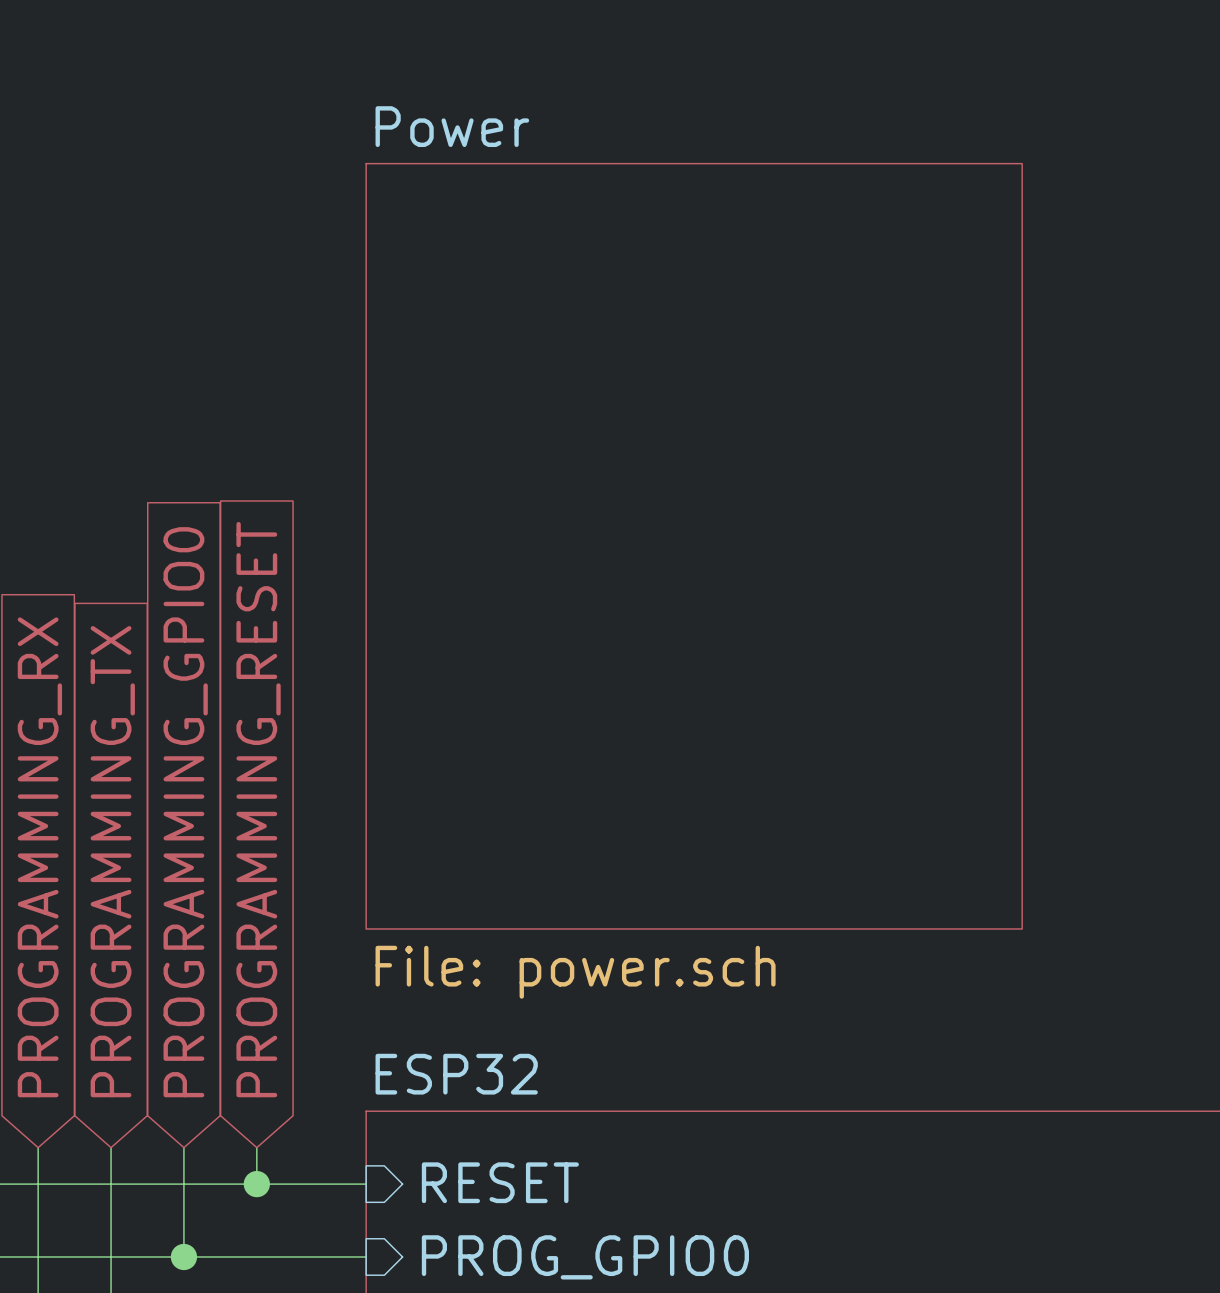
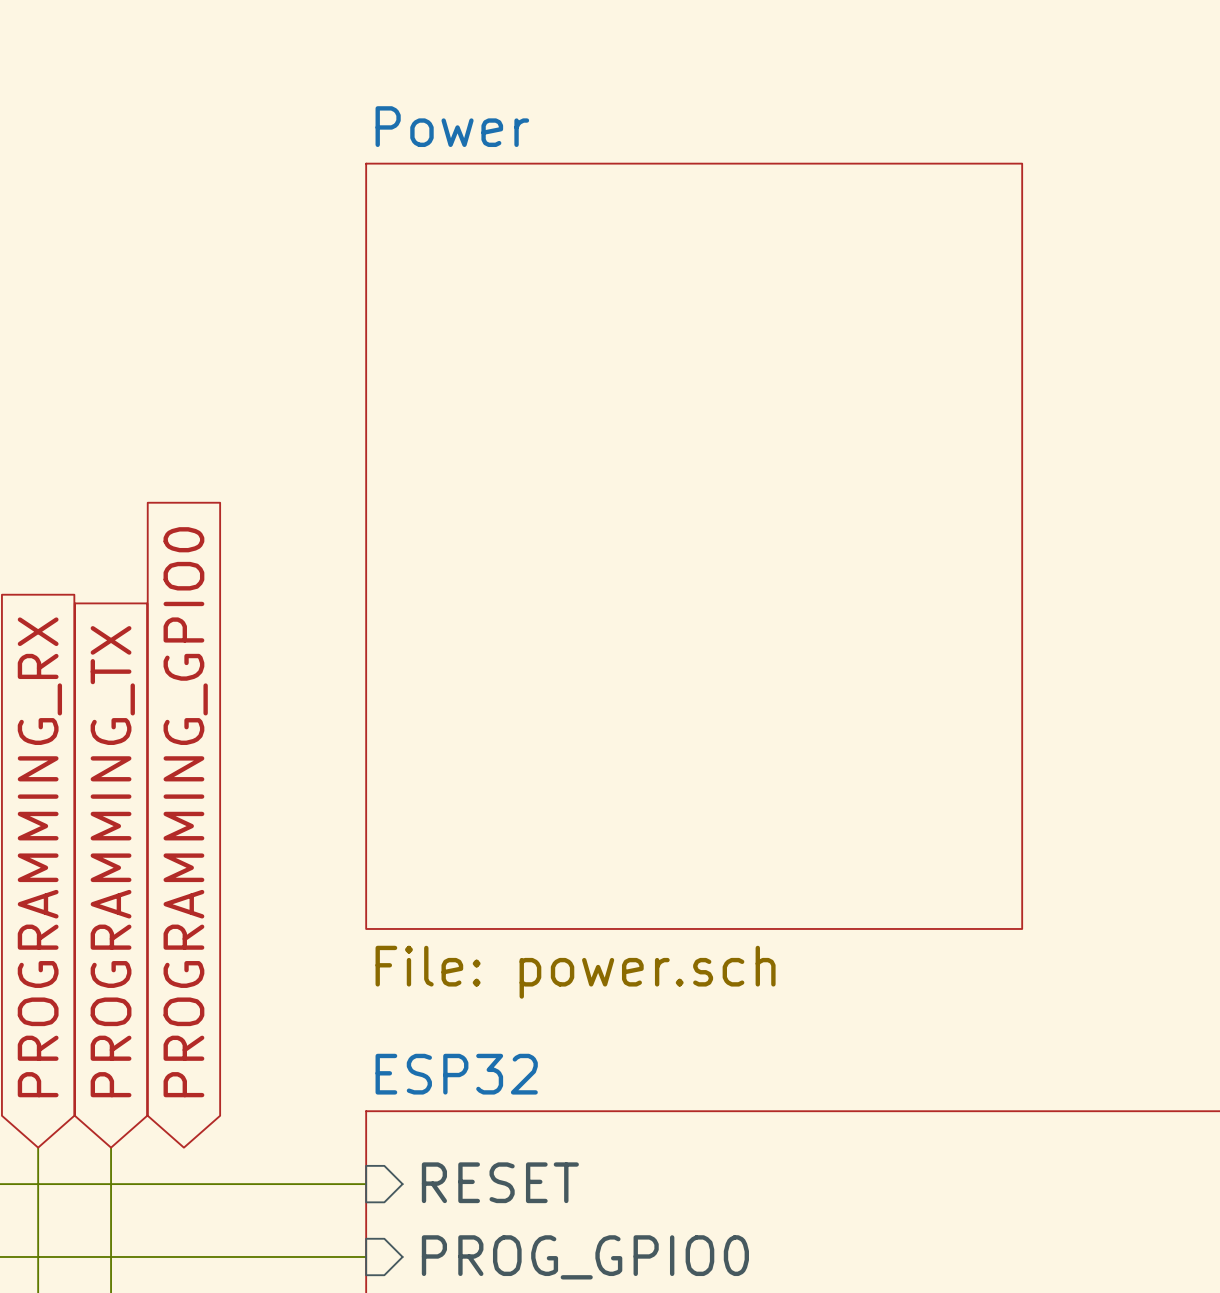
global label: PROGRAMMING_RESET (258, 809) -> none
wire: (183, 1147) (183, 1256) -> none
wire: (256, 1147) (256, 1184) -> none
junction: (256, 1184) -> none
junction: (183, 1256) -> none

